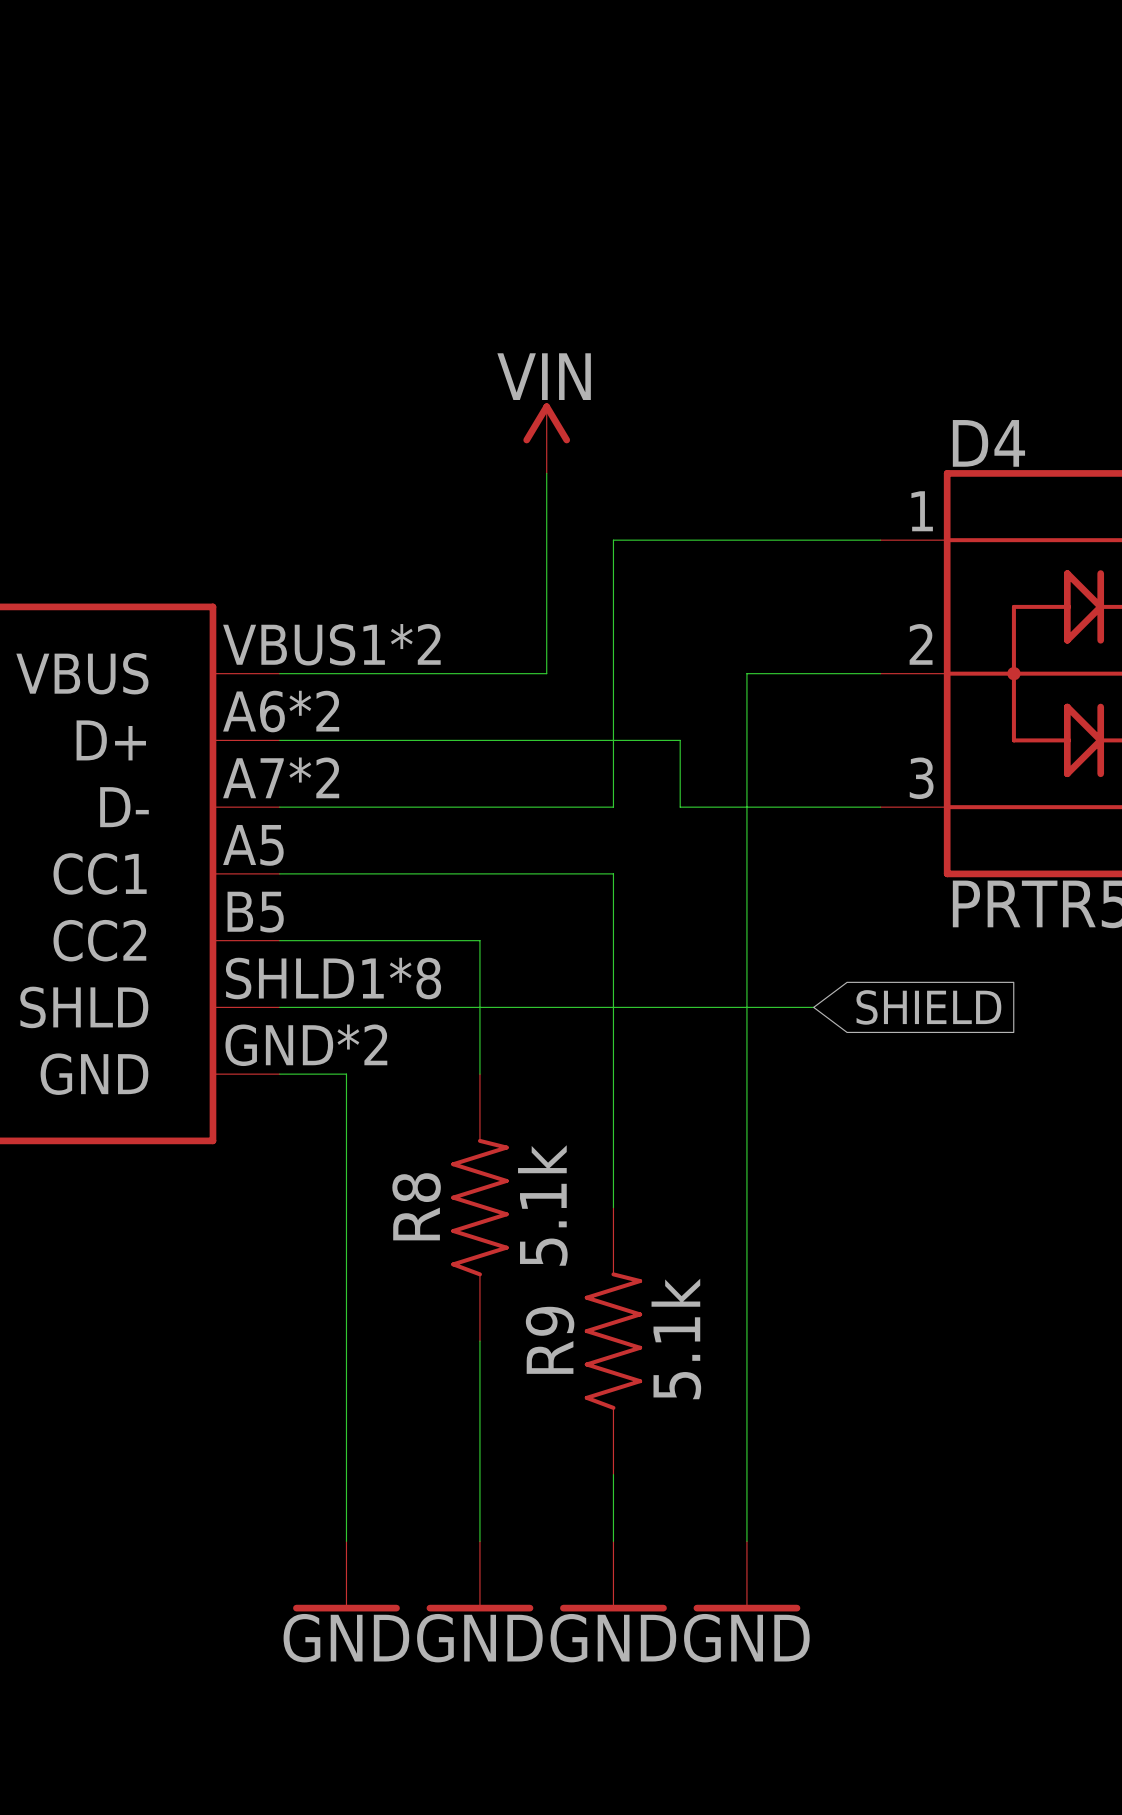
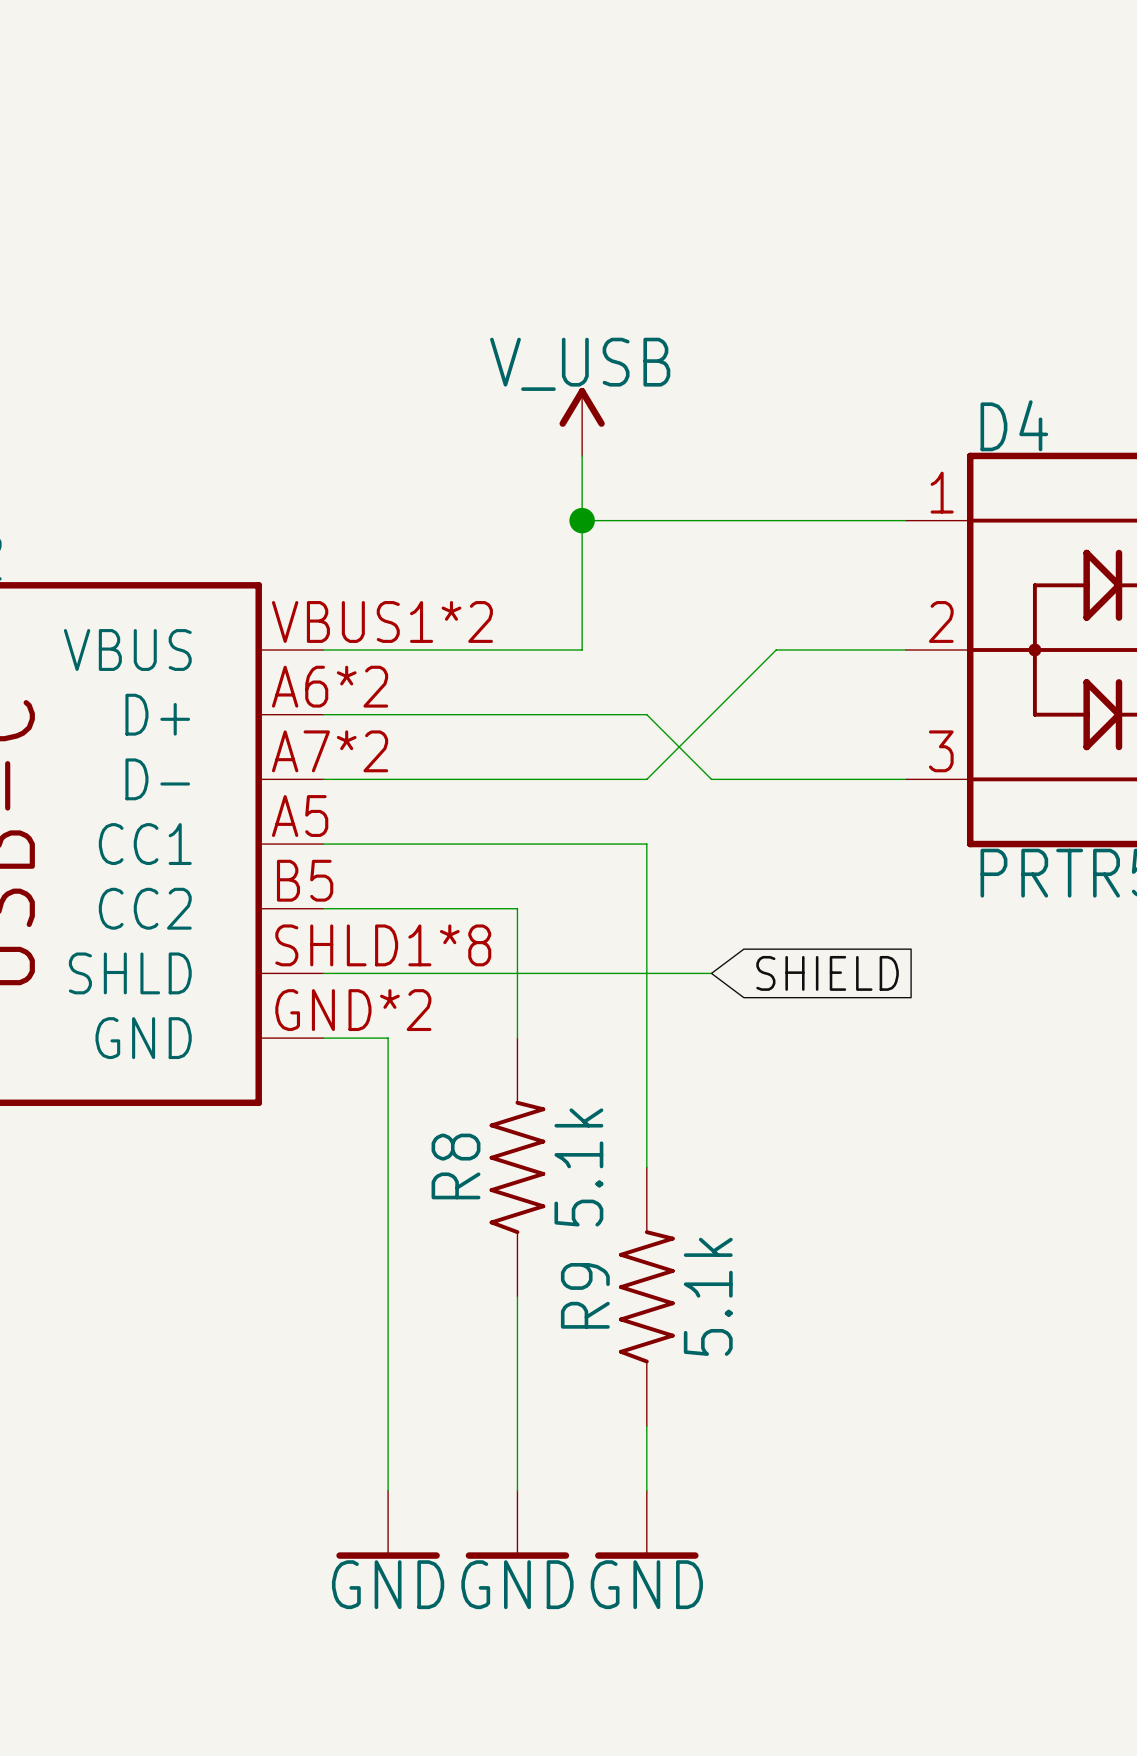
power symbol: VIN (546, 438) -> V_USB (582, 421)
wire: none -> (582, 520) (646, 520)
junction: none -> (582, 520)
wire: (613, 540) (613, 807) -> (776, 649) (646, 779)
wire: (746, 673) (746, 1541) -> none
wire: (613, 740) (680, 740) (680, 807) -> (646, 714) (711, 779)
wire: (680, 1007) (813, 1007) -> none
global label position: SHIELD (928, 1007) -> SHIELD (827, 973)
power symbol: GND (746, 1576) -> none

